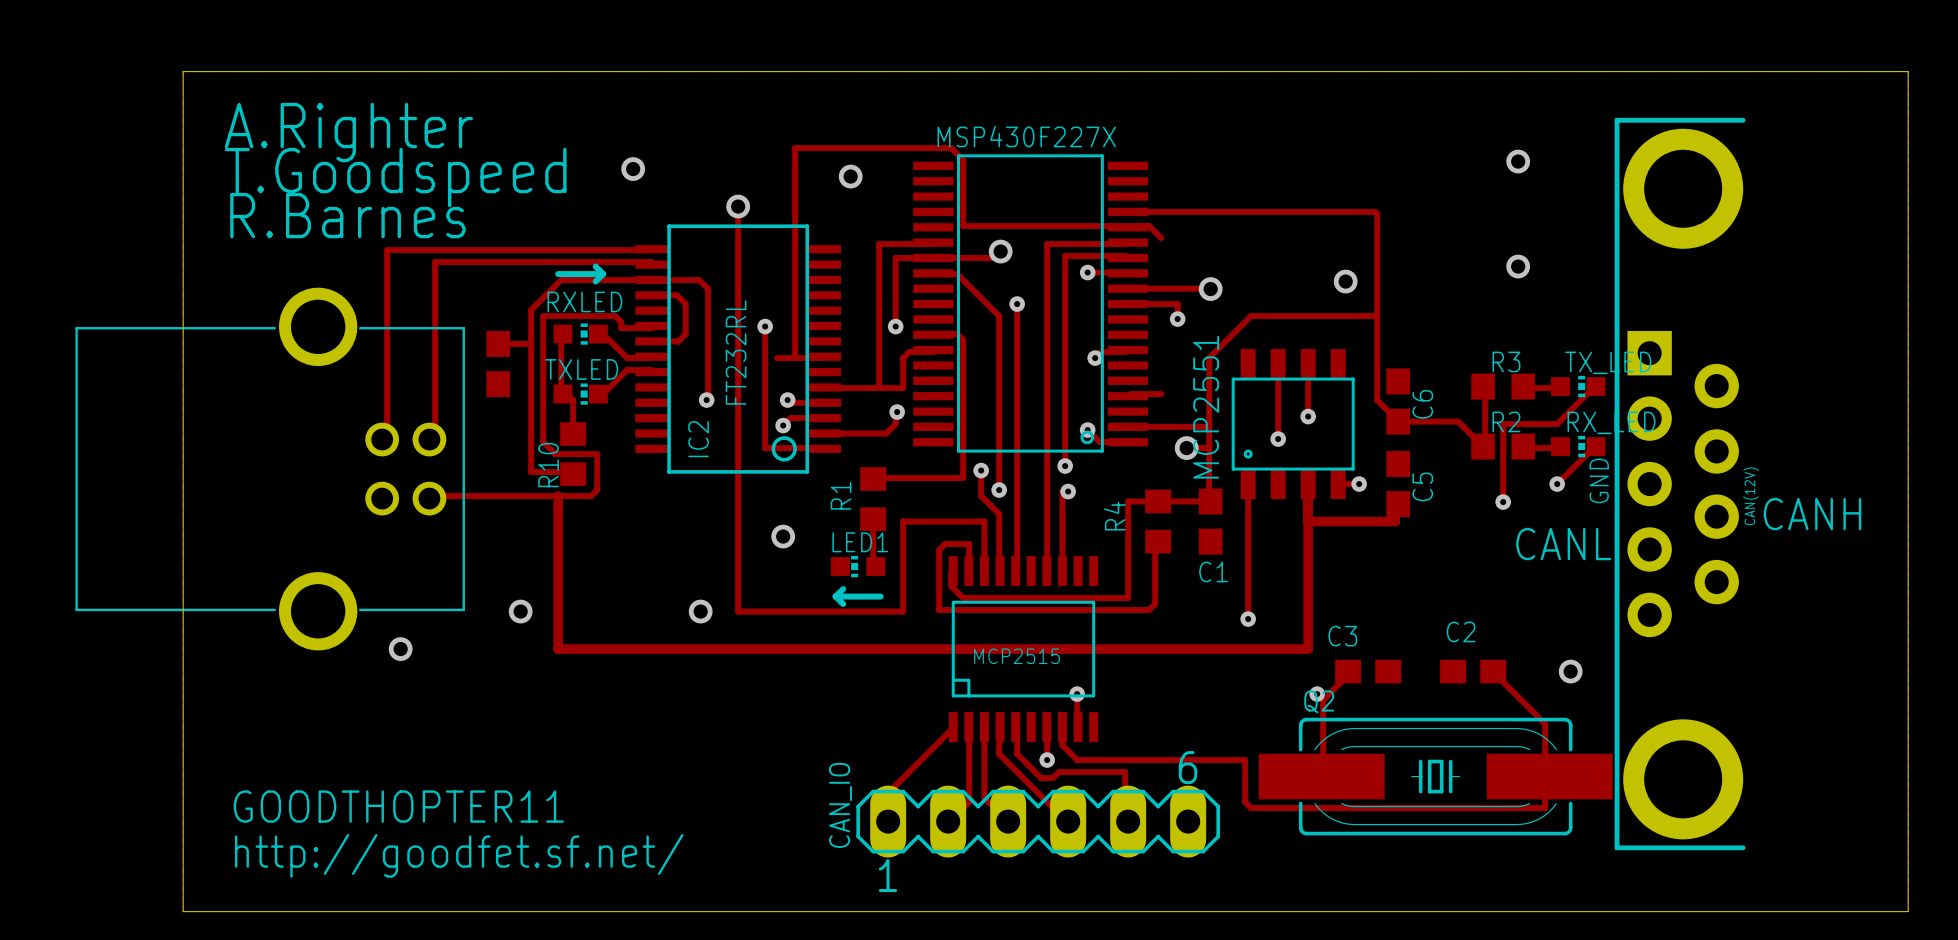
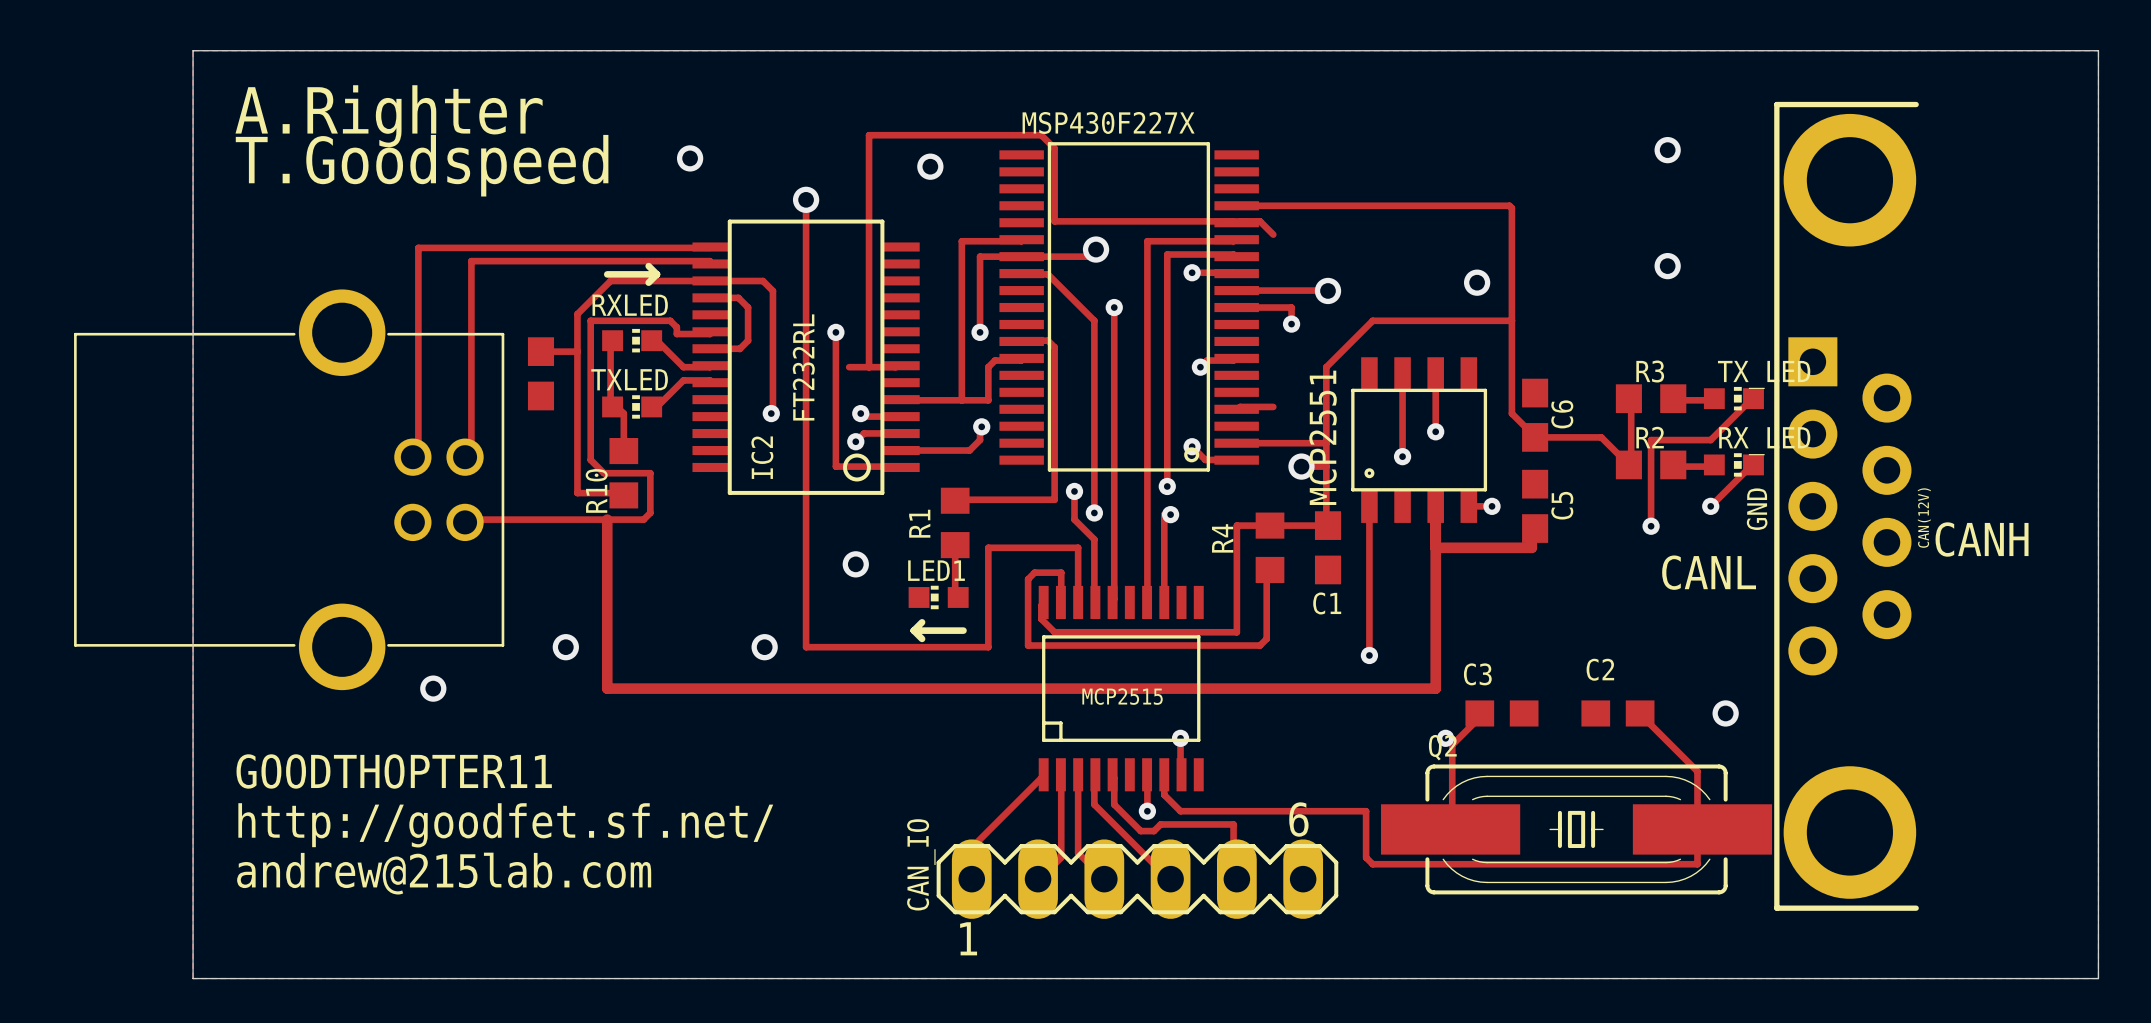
text: R.Barnes (347, 215) -> none
text position: GOODTHOPTER11 (398, 806) -> GOODTHOPTER11 (394, 771)
text: none -> andrew@215lab.com (444, 873)
text position: http://goodfet.sf.net/ (459, 855) -> http://goodfet.sf.net/ (505, 825)

